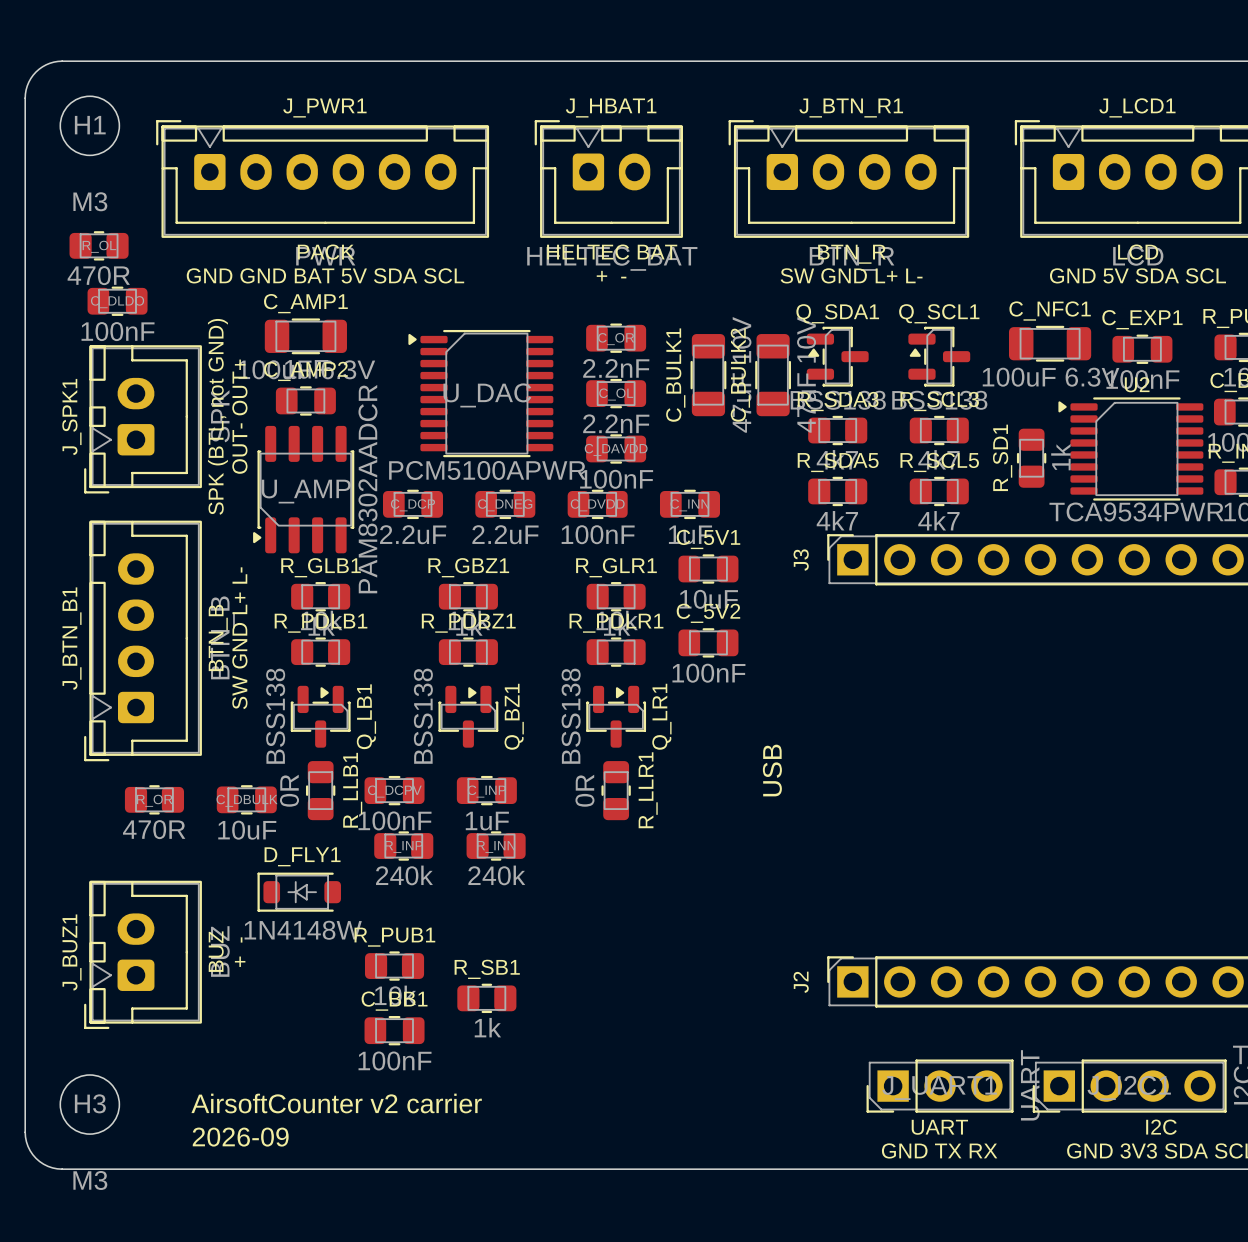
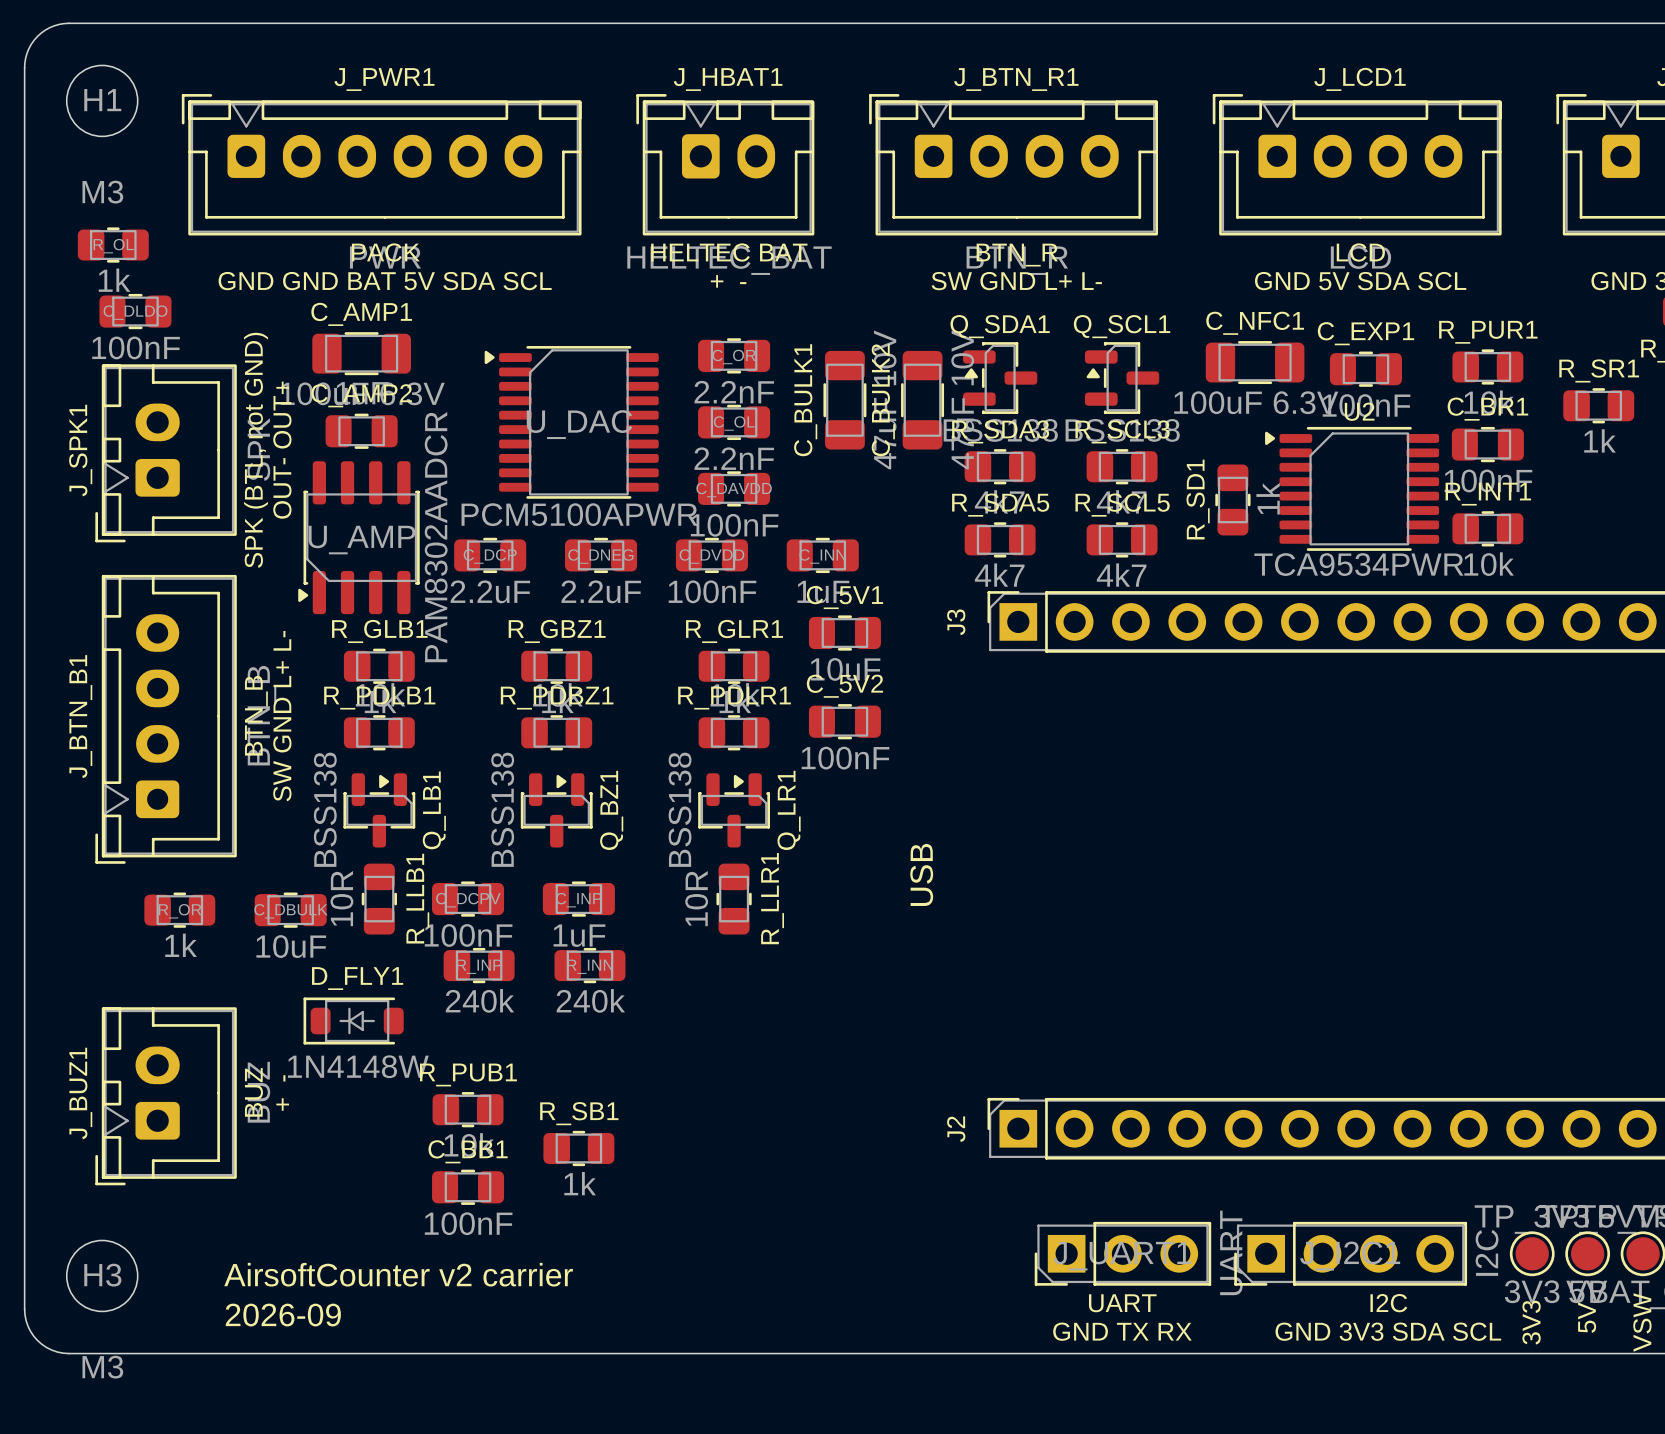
R_OL value: 470R (98, 275) -> 1k (114, 280)
R_LLB1 value: 0R (289, 790) -> 10R (341, 898)
R_LLR1 value: 0R (584, 790) -> 10R (696, 898)
R_OR value: 470R (154, 829) -> 1k (181, 945)

